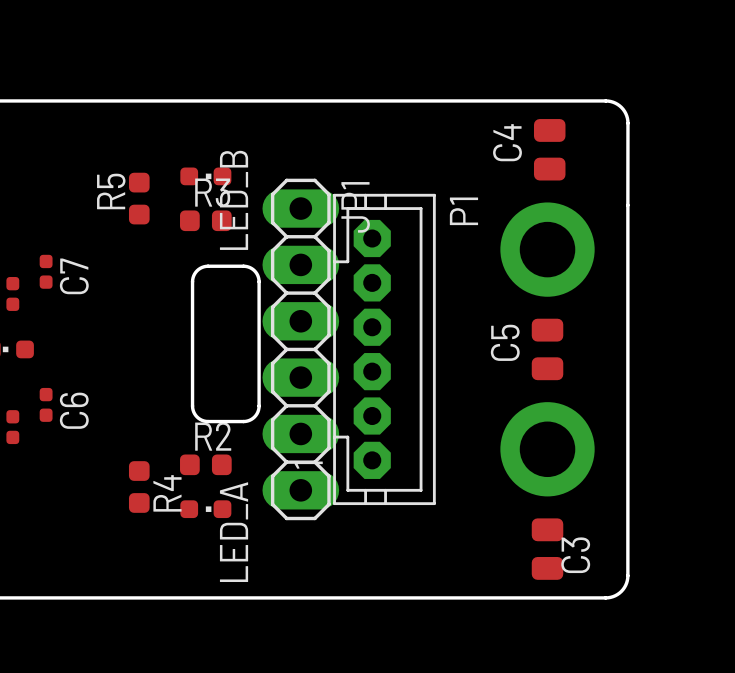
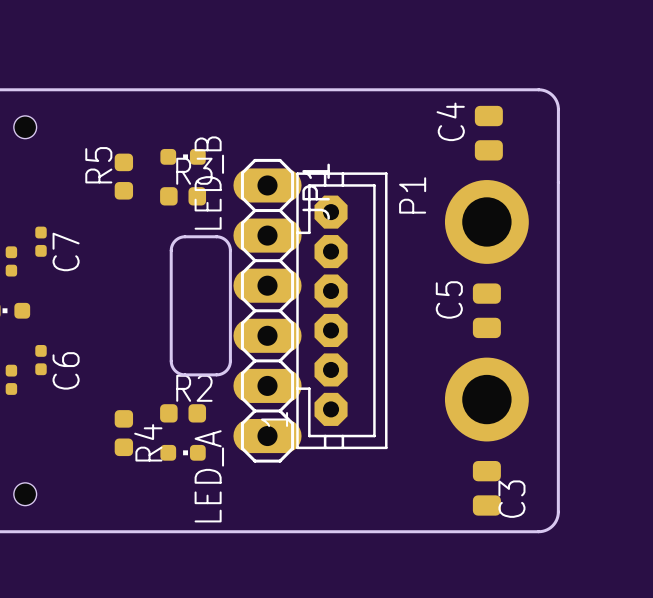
hole: none -> (25, 127)
hole: none -> (25, 494)

